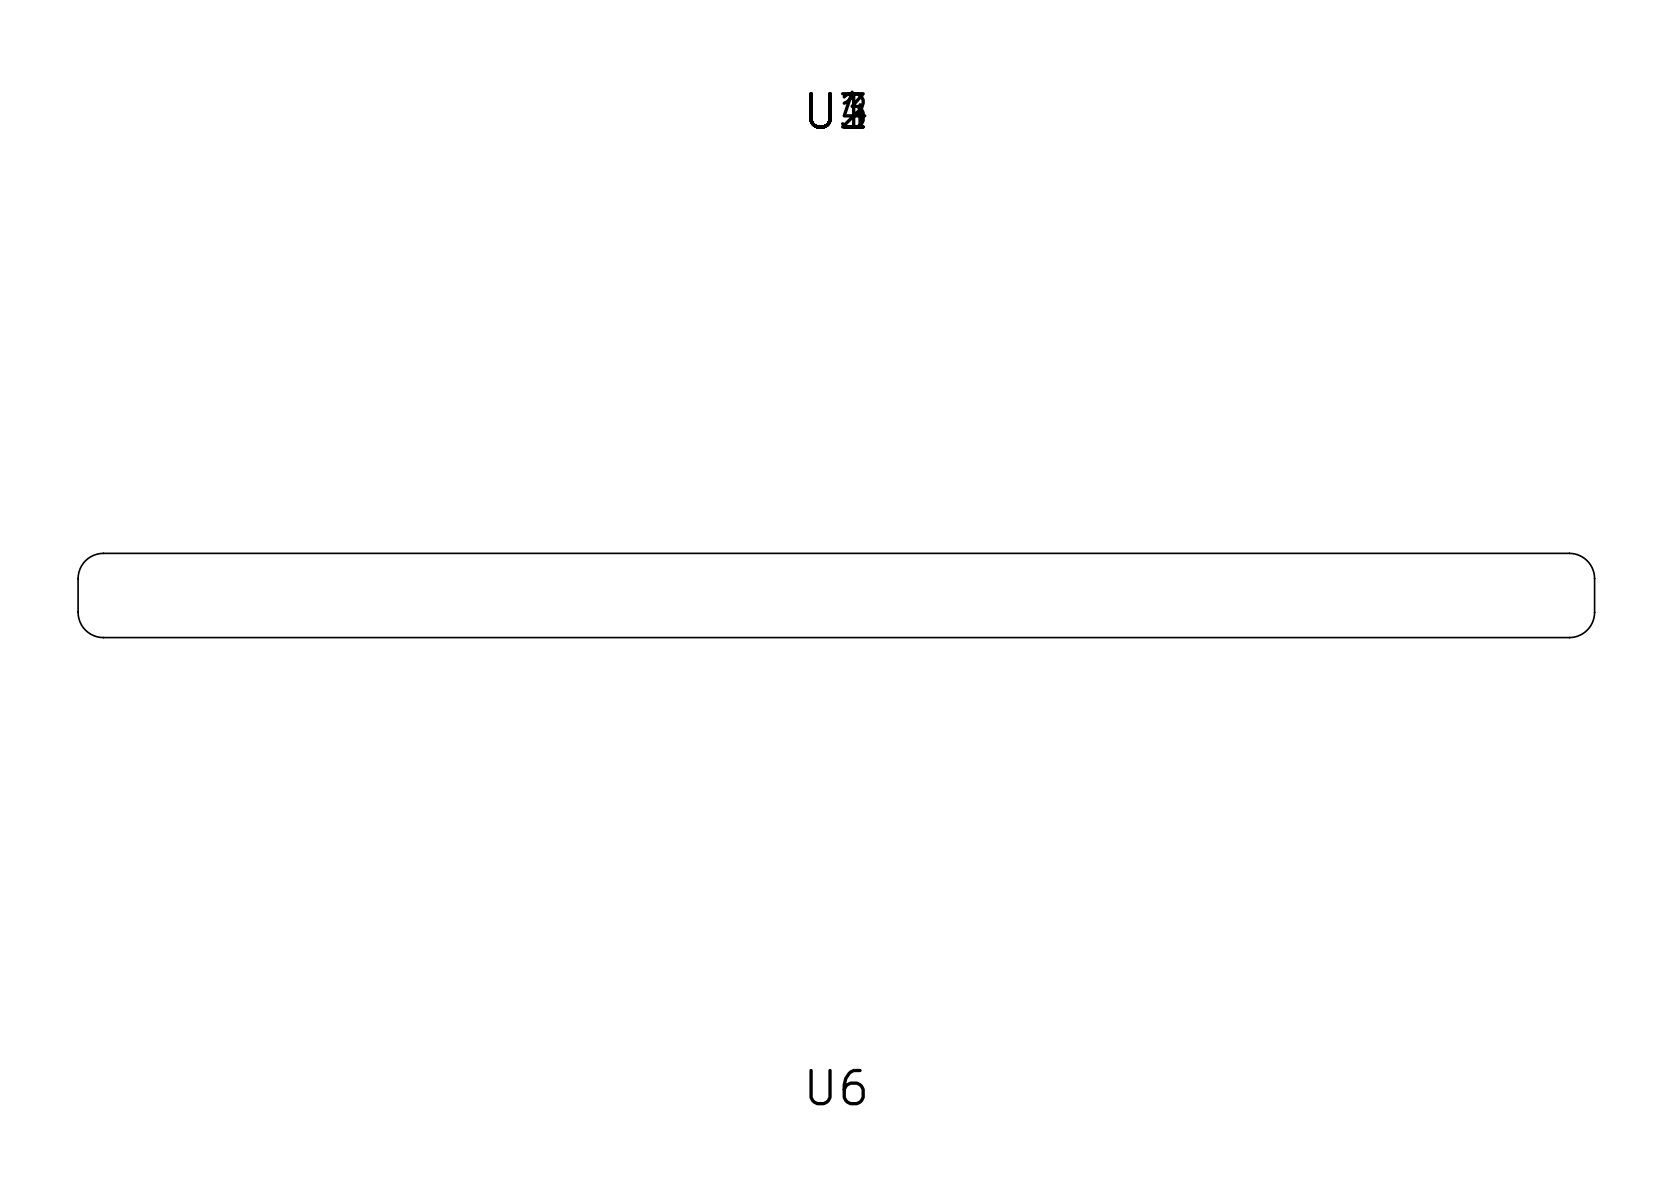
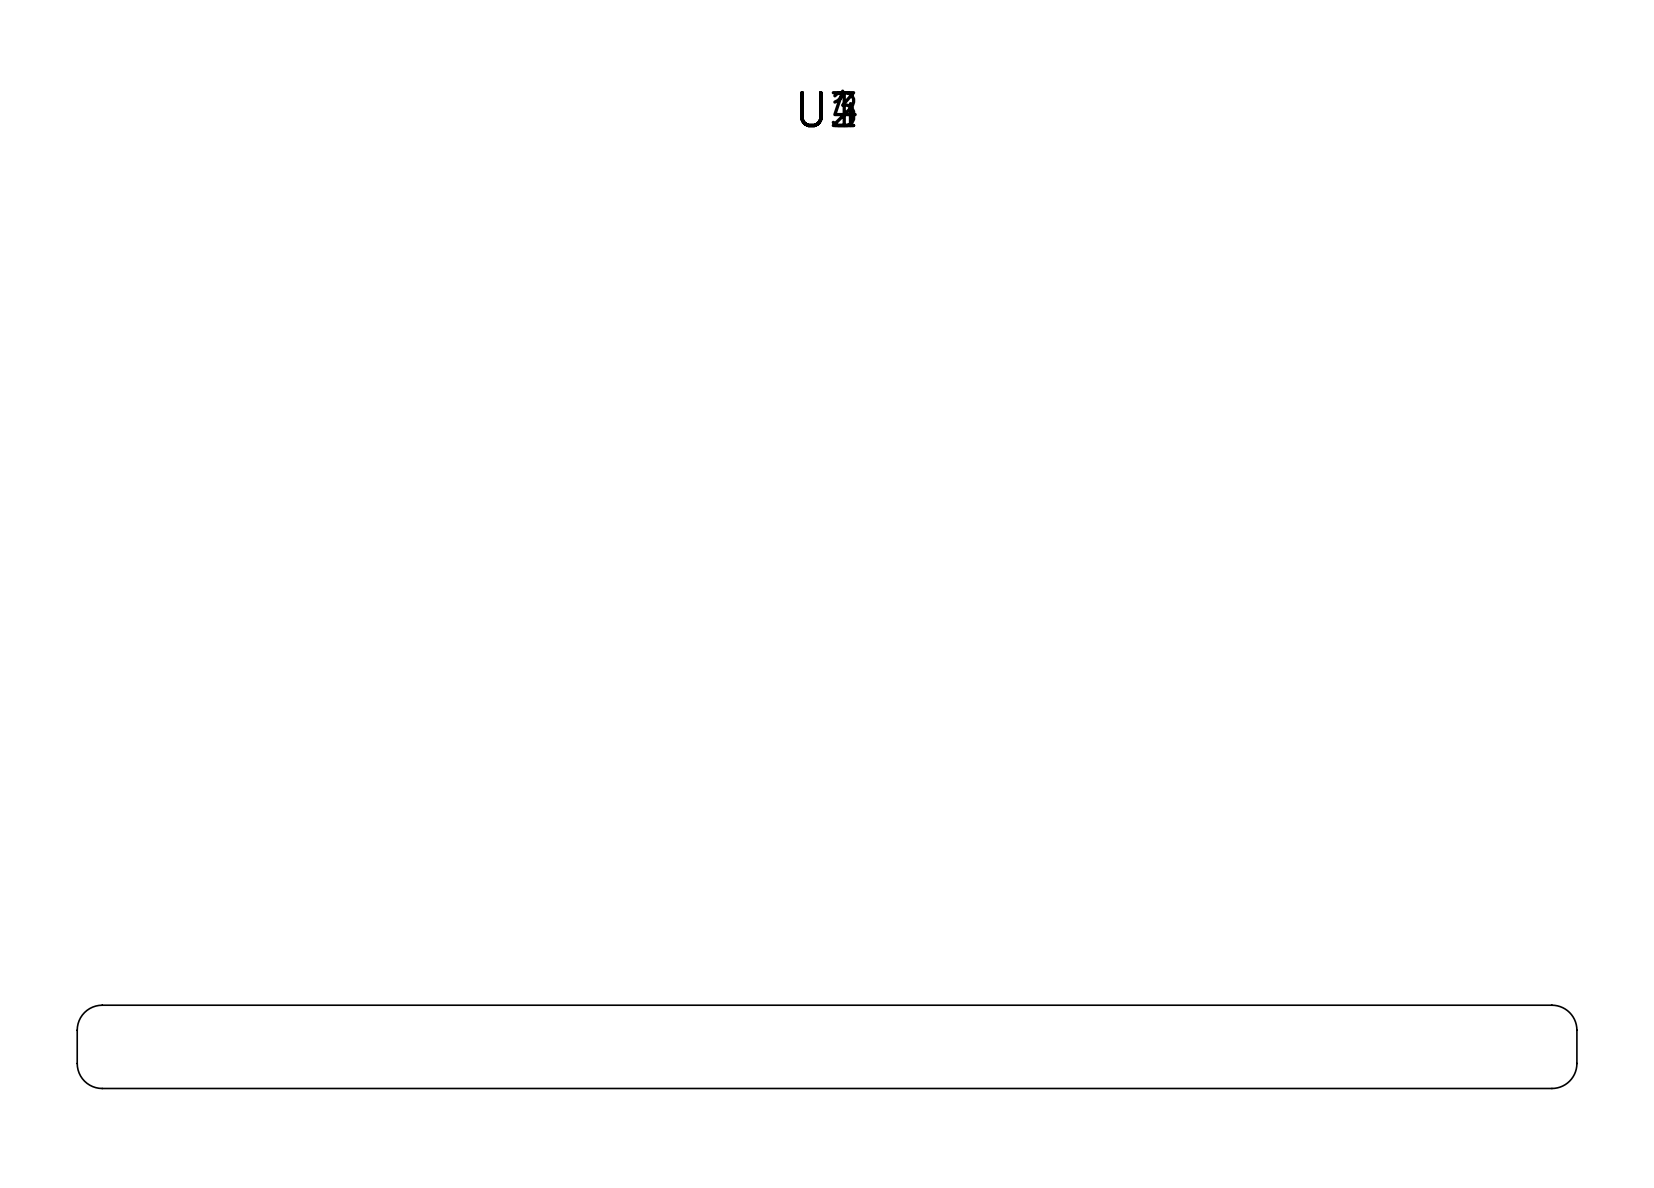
board edge: (103, 553) (1569, 553) (1582, 557) (1592, 567) (1594, 578) (1594, 612) (1593, 620) (1587, 630) (1580, 635) (1569, 637) (103, 637) (93, 635) (85, 630) (80, 621) (78, 612) (80, 568) (87, 558) (103, 553) -> (102, 1005) (1551, 1005) (1565, 1009) (1574, 1019) (1576, 1030) (1576, 1063) (1575, 1071) (1569, 1081) (1562, 1086) (1551, 1088) (102, 1088) (92, 1086) (84, 1081) (79, 1073) (77, 1063) (79, 1020) (89, 1008) (102, 1005)
U6: (837, 1087) -> none

